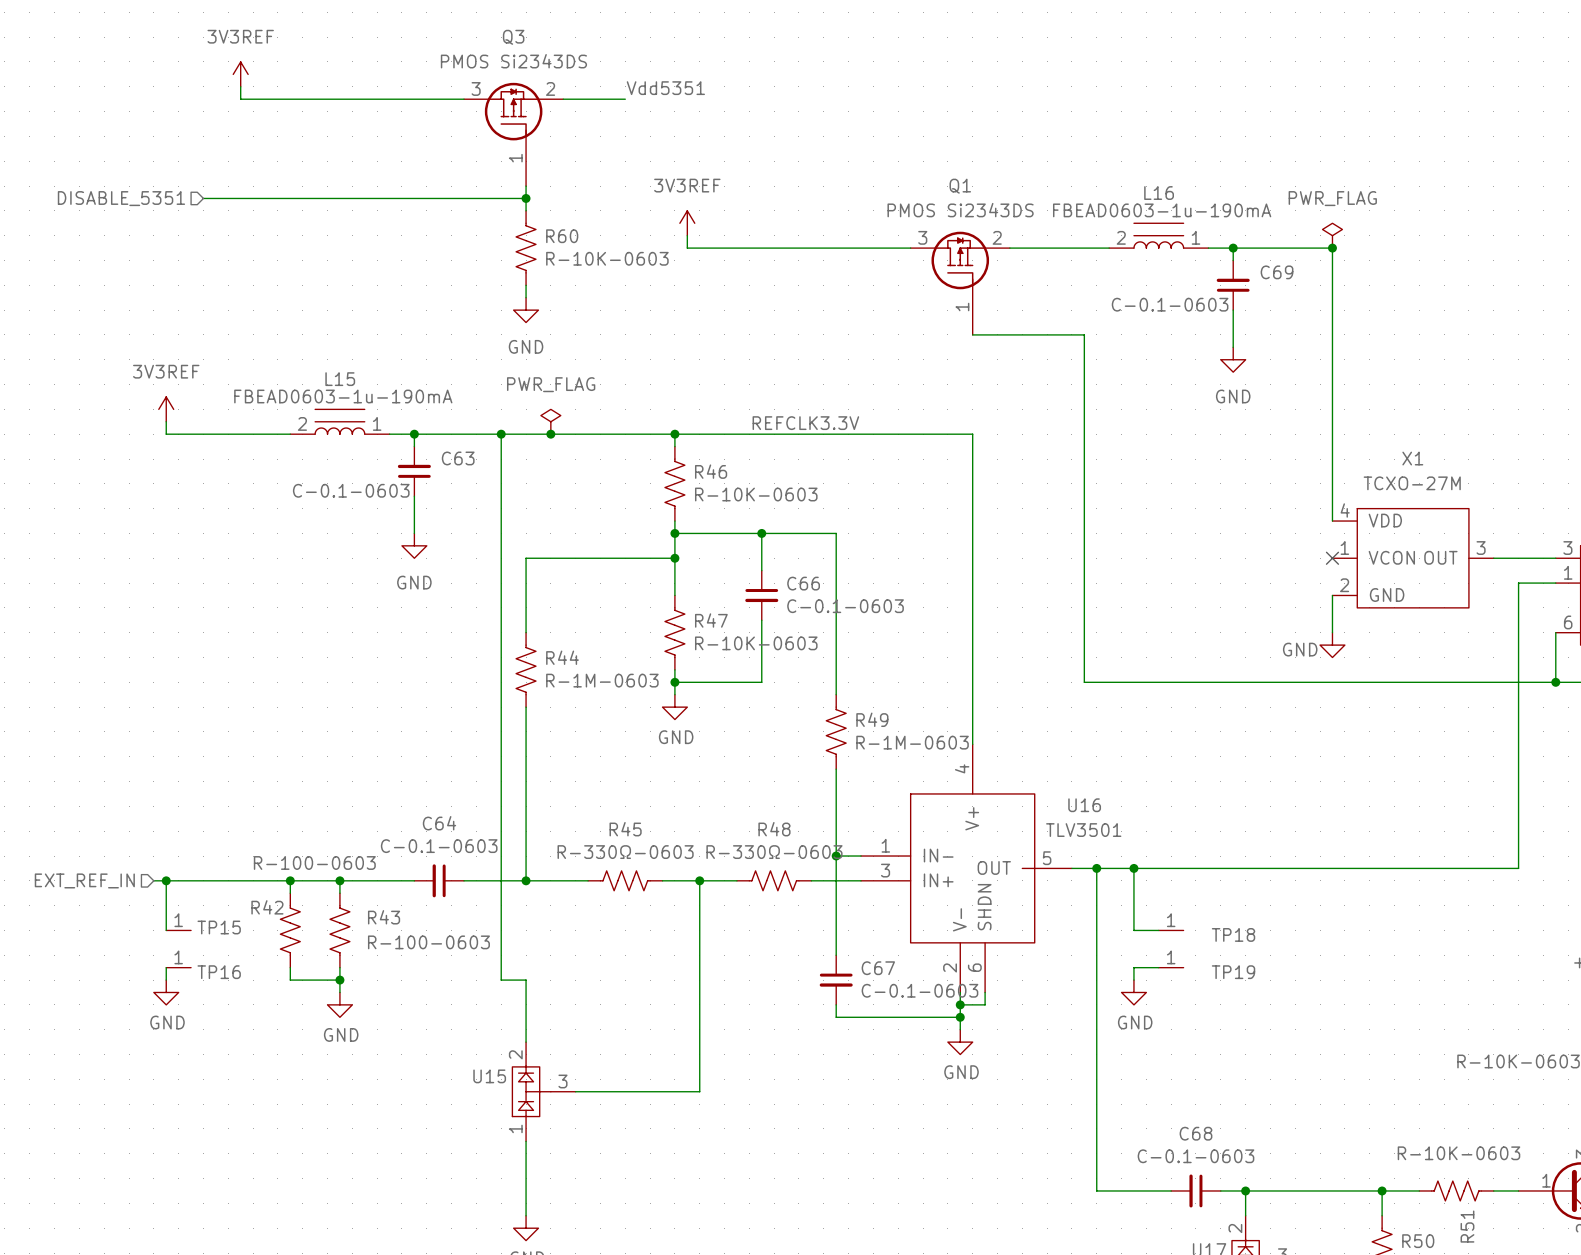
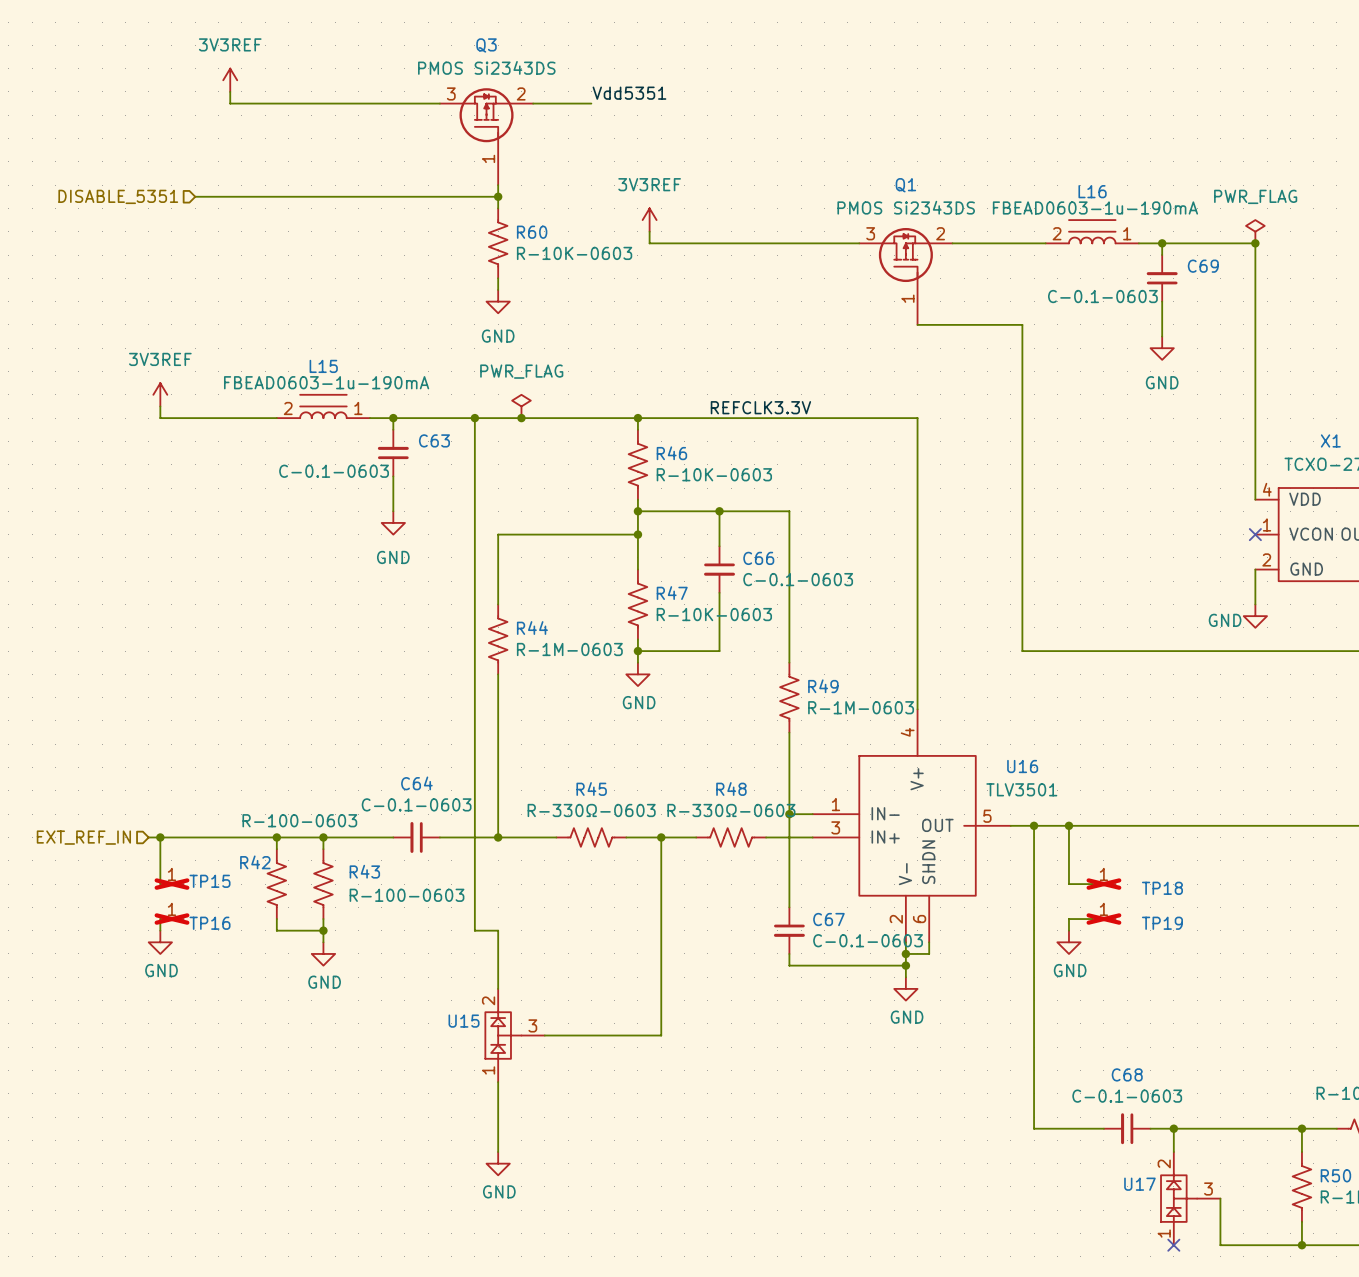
TP15 do-not-place cross: none -> (171, 884)
TP18 do-not-place cross: none -> (1103, 884)
TP16 do-not-place cross: none -> (171, 919)
TP19 do-not-place cross: none -> (1103, 919)

